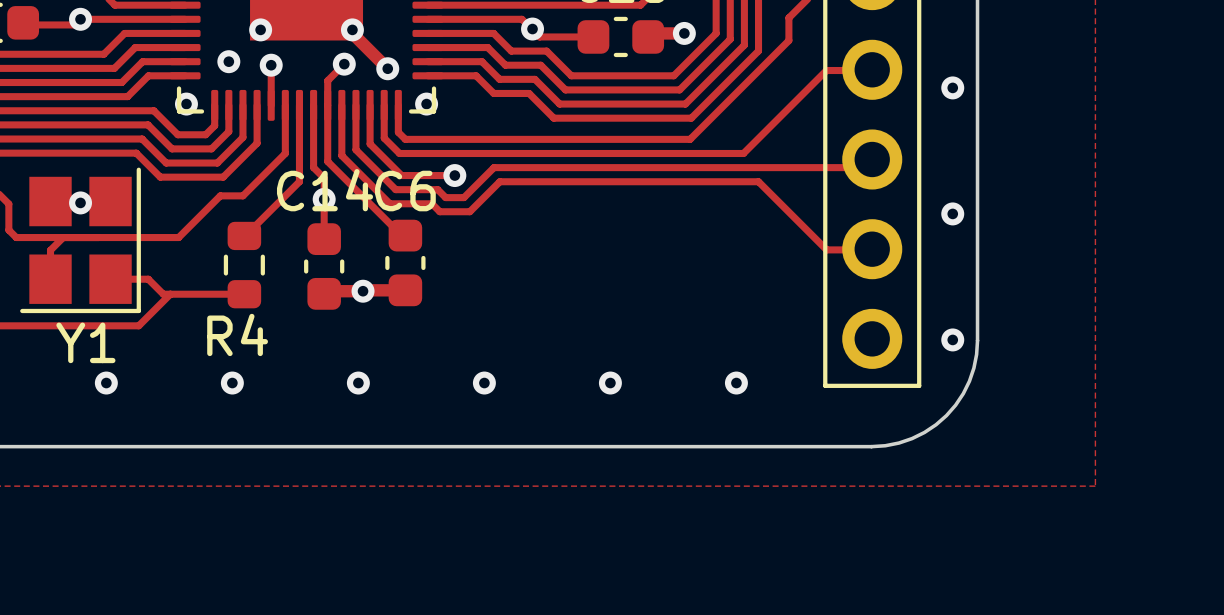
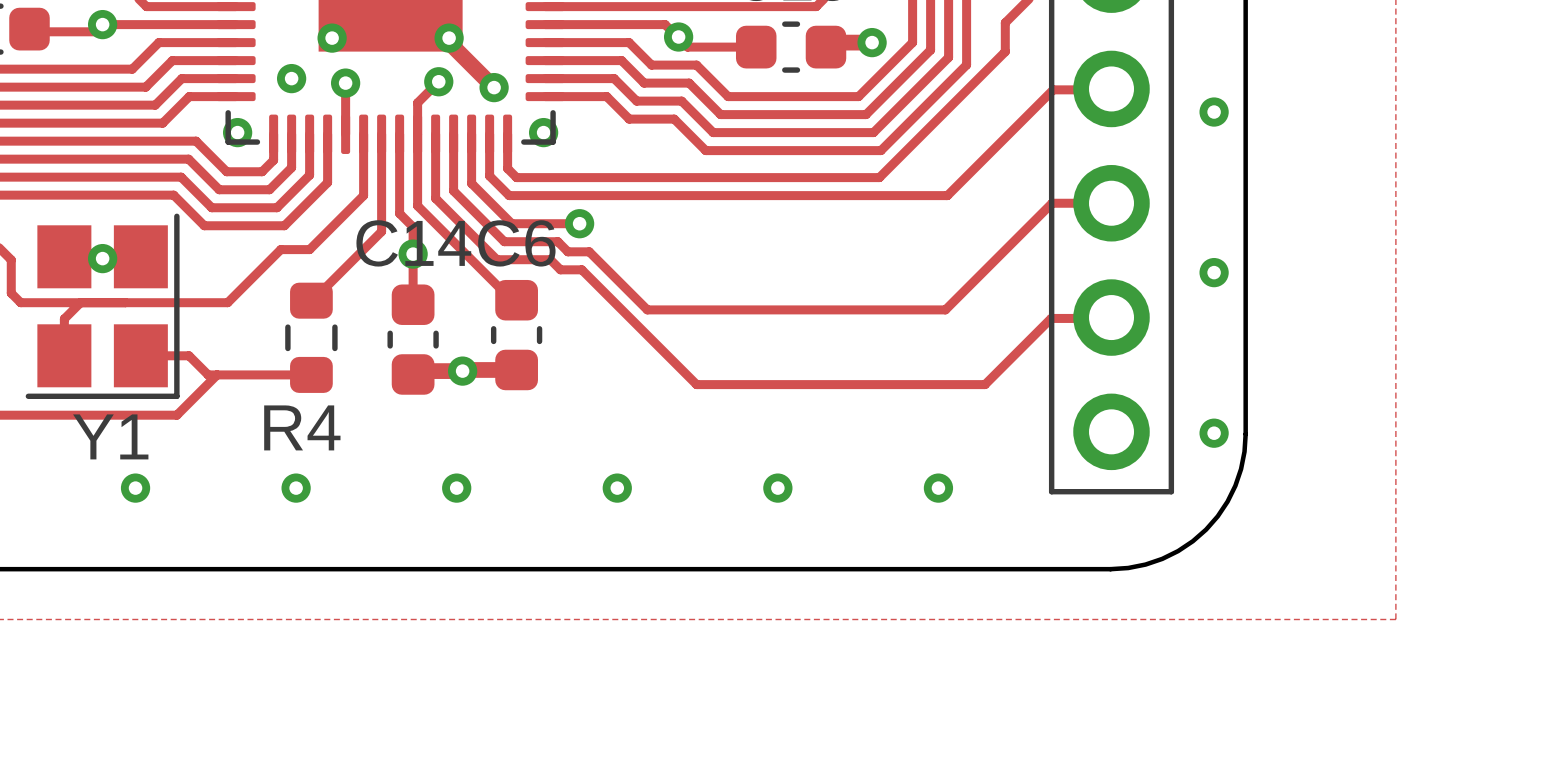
track: (872, 159) (864, 167) (493, 167) (462, 197) -> (1111, 203) (1052, 203) (945, 309) (647, 309) (589, 251)
track: (456, 211) (469, 211) (499, 181) (758, 181) (826, 249) -> (581, 269) (696, 384) (985, 384) (1051, 318) (1053, 318)

